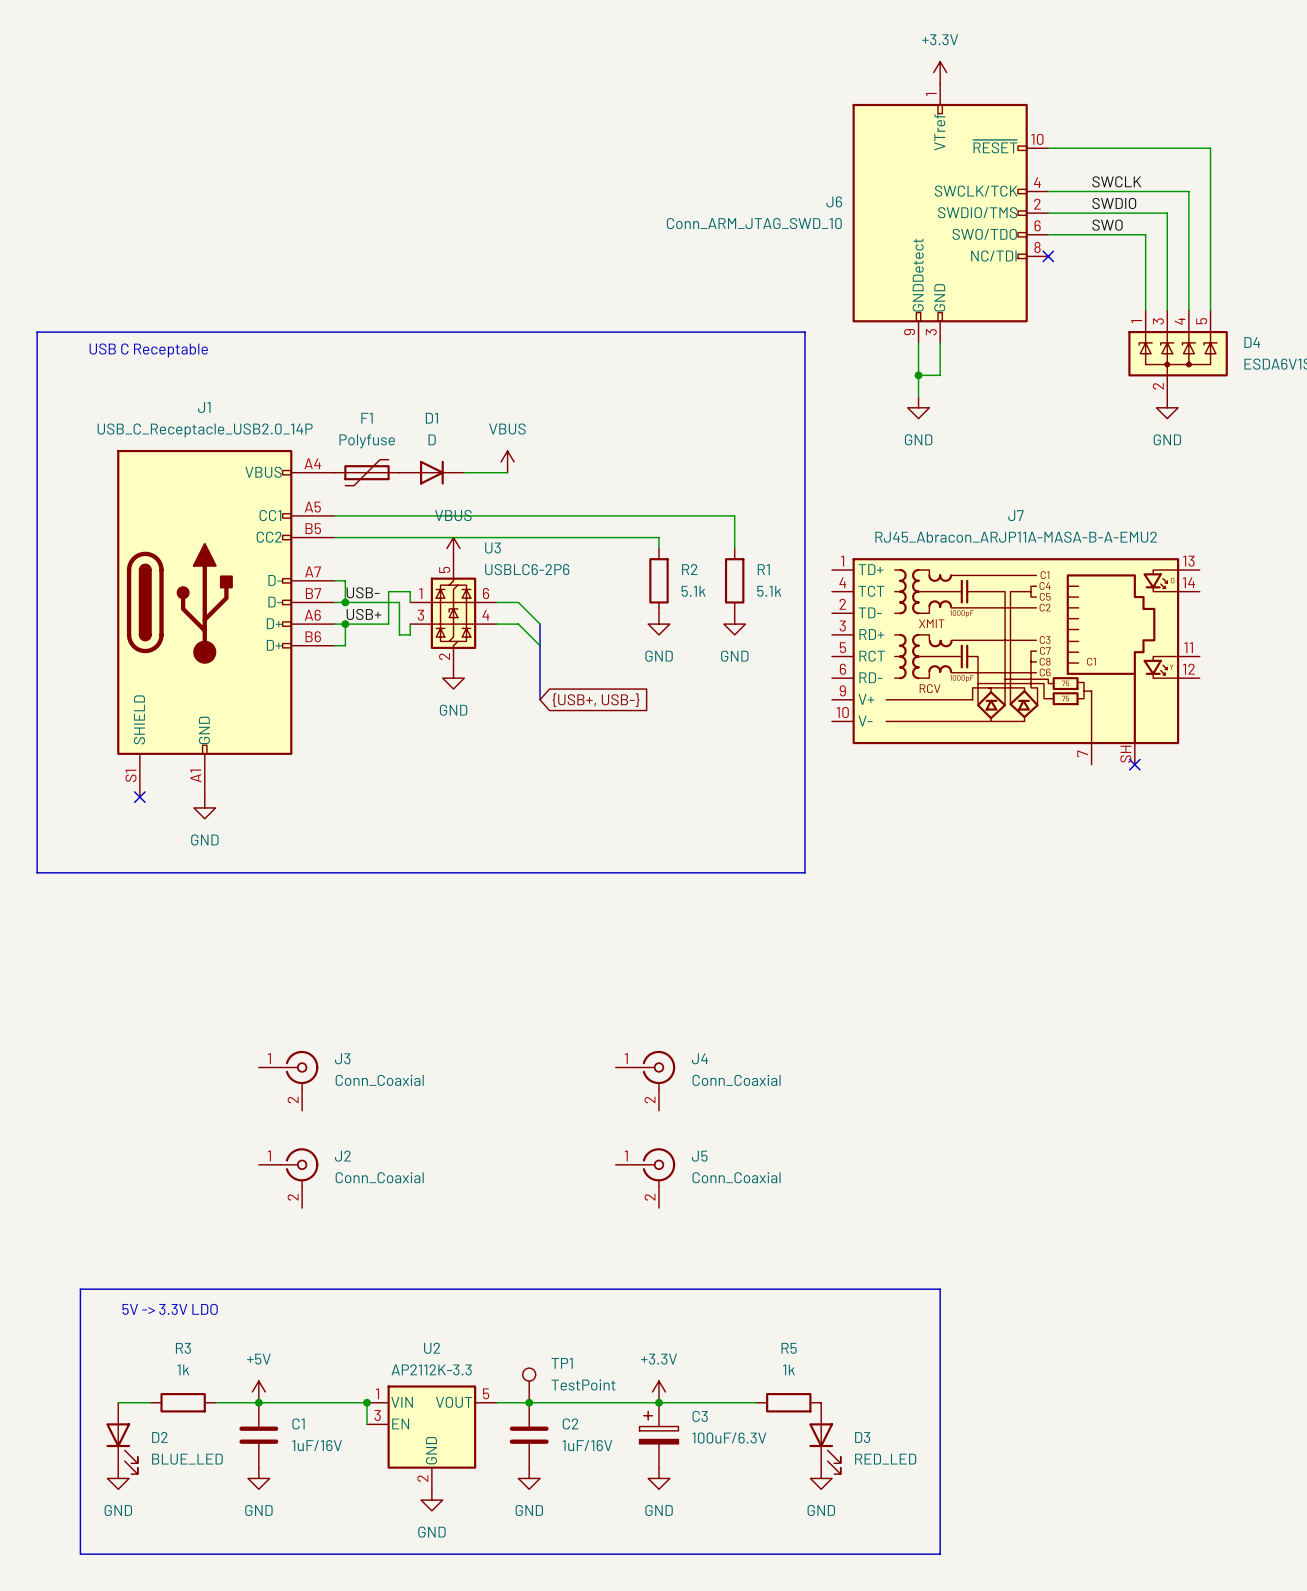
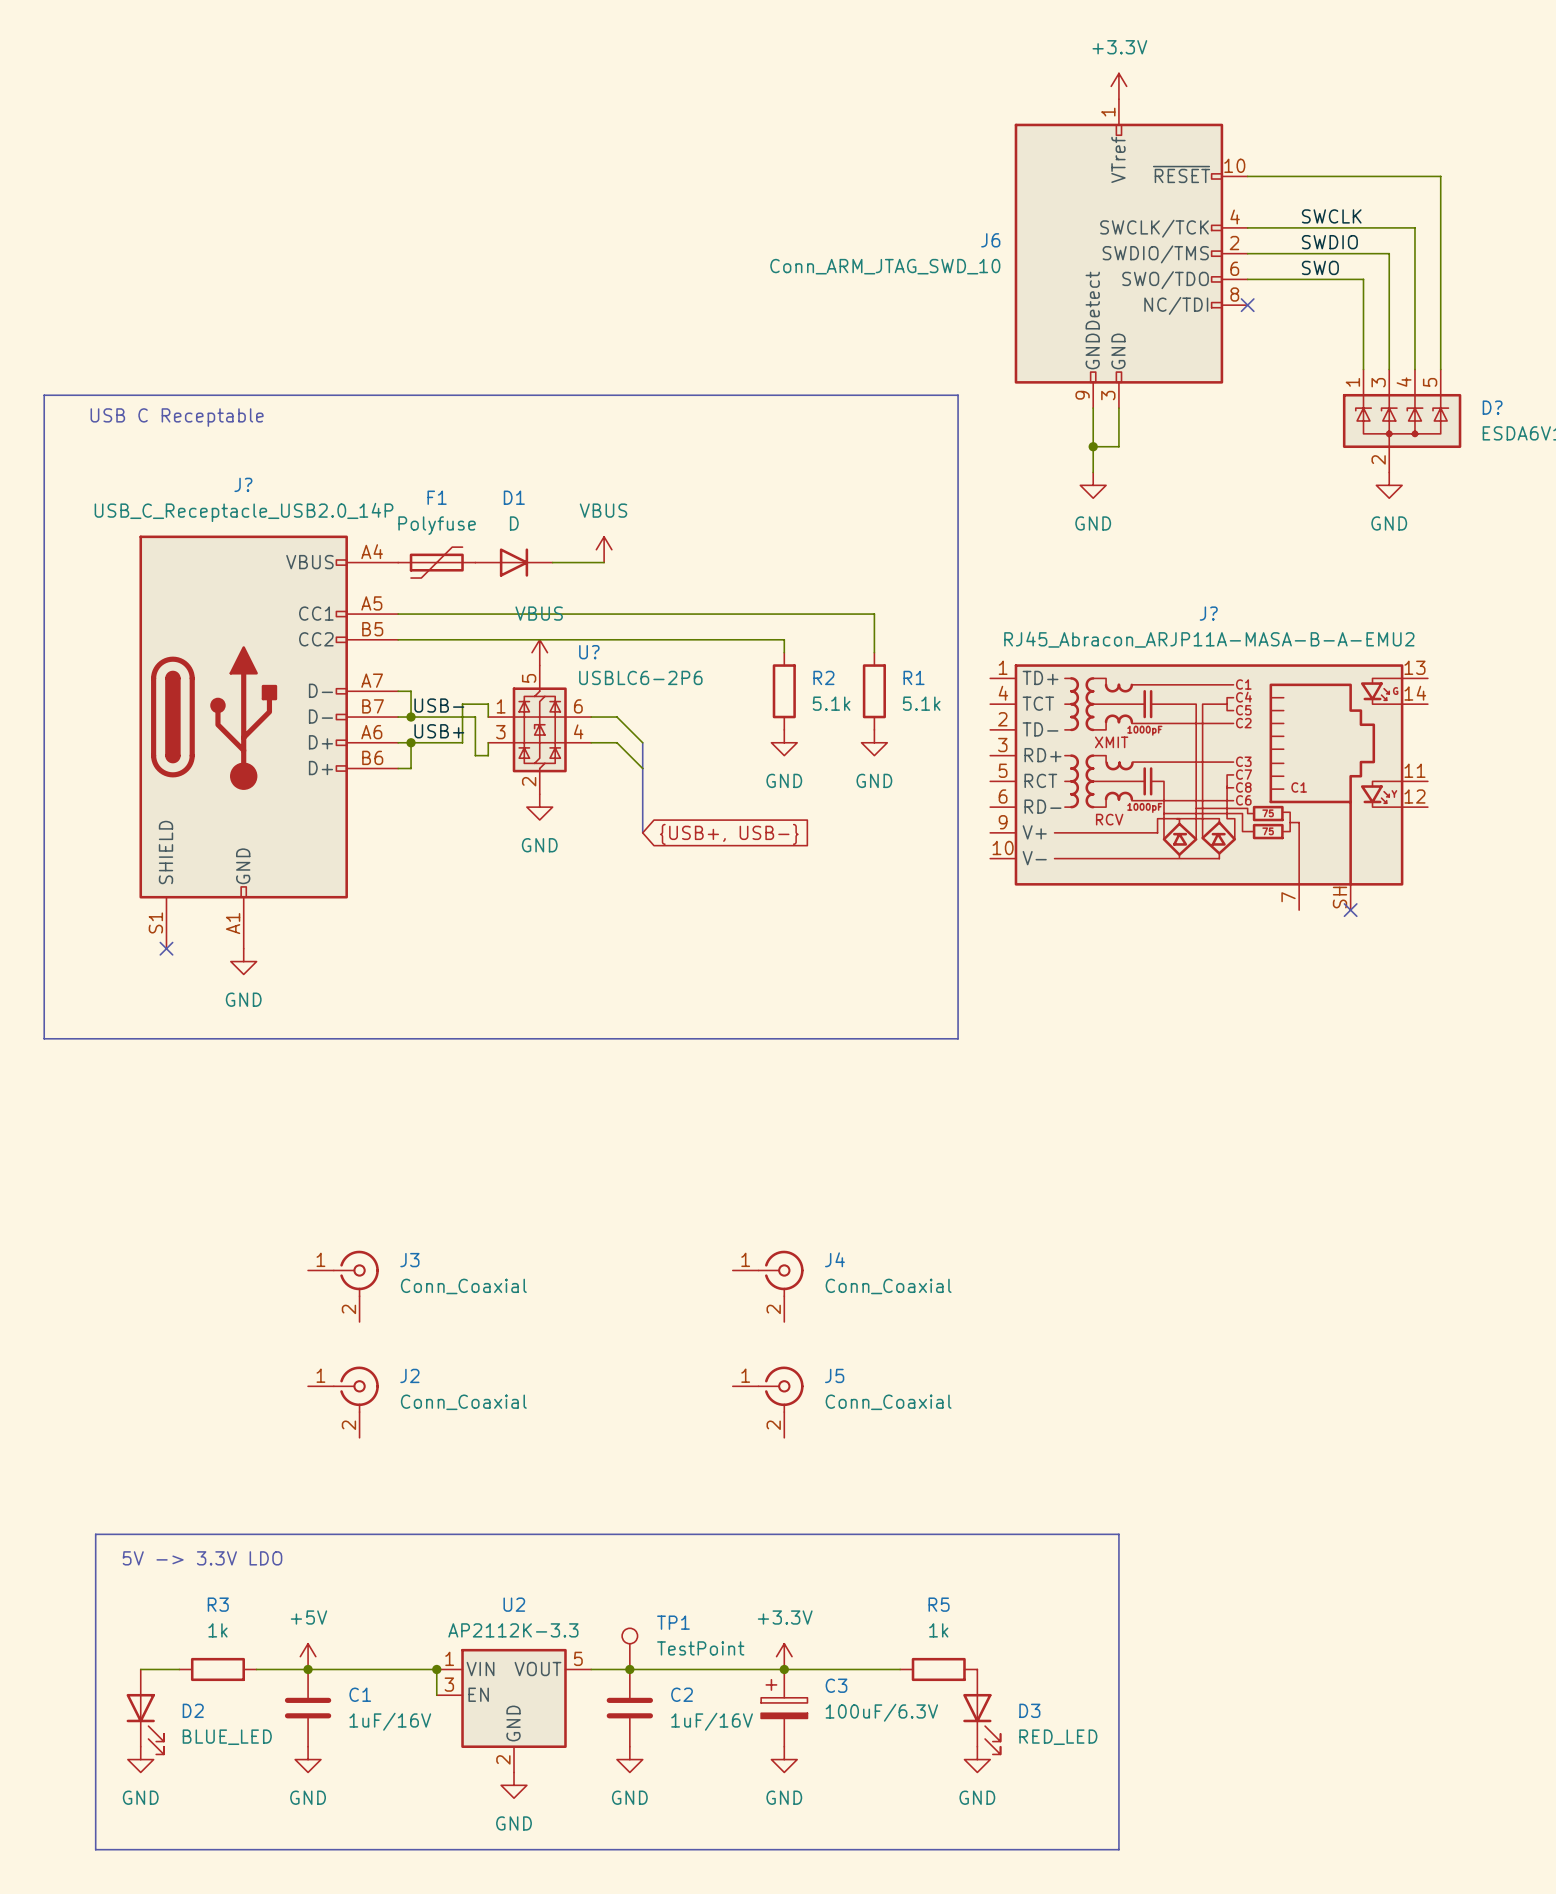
D4 name: D4 (1252, 342) -> D? (1492, 407)
J1 name: J1 (204, 407) -> J? (243, 484)
J7 name: J7 (1015, 515) -> J? (1208, 613)
U3 name: U3 (492, 548) -> U? (589, 652)

